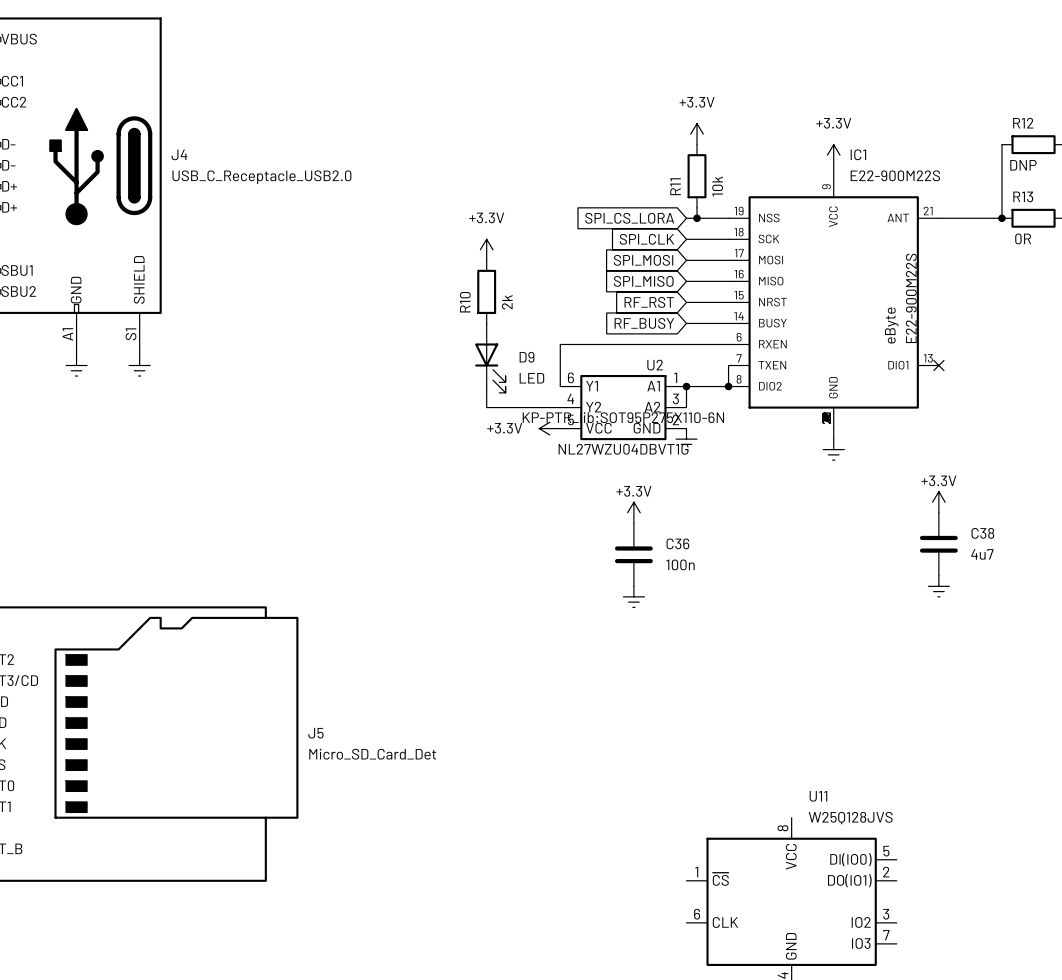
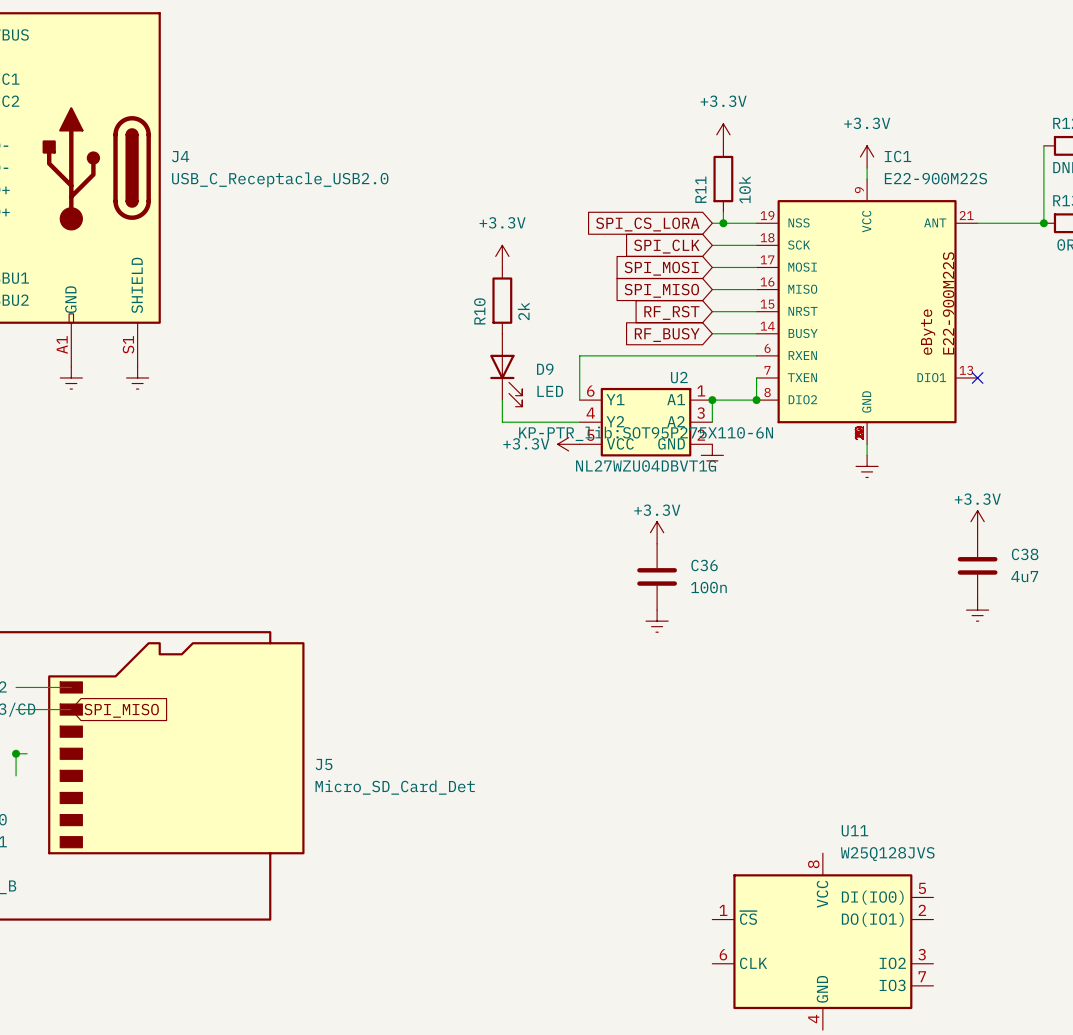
wire: none -> (16, 687) (71, 687)
wire: none -> (16, 709) (71, 709)
global label: none -> SPI_MISO (121, 710)
junction: none -> (16, 753)
wire: none -> (27, 753) (16, 753) (16, 775)

